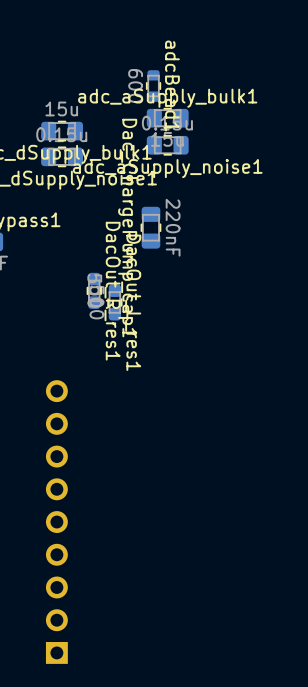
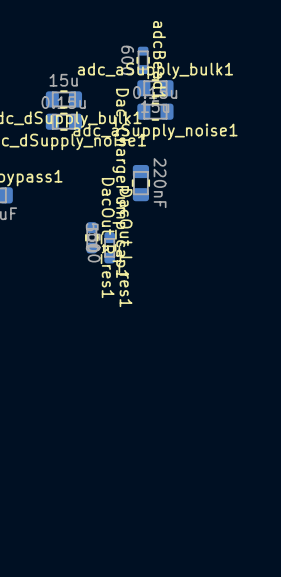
part: (56, 522) -> none

